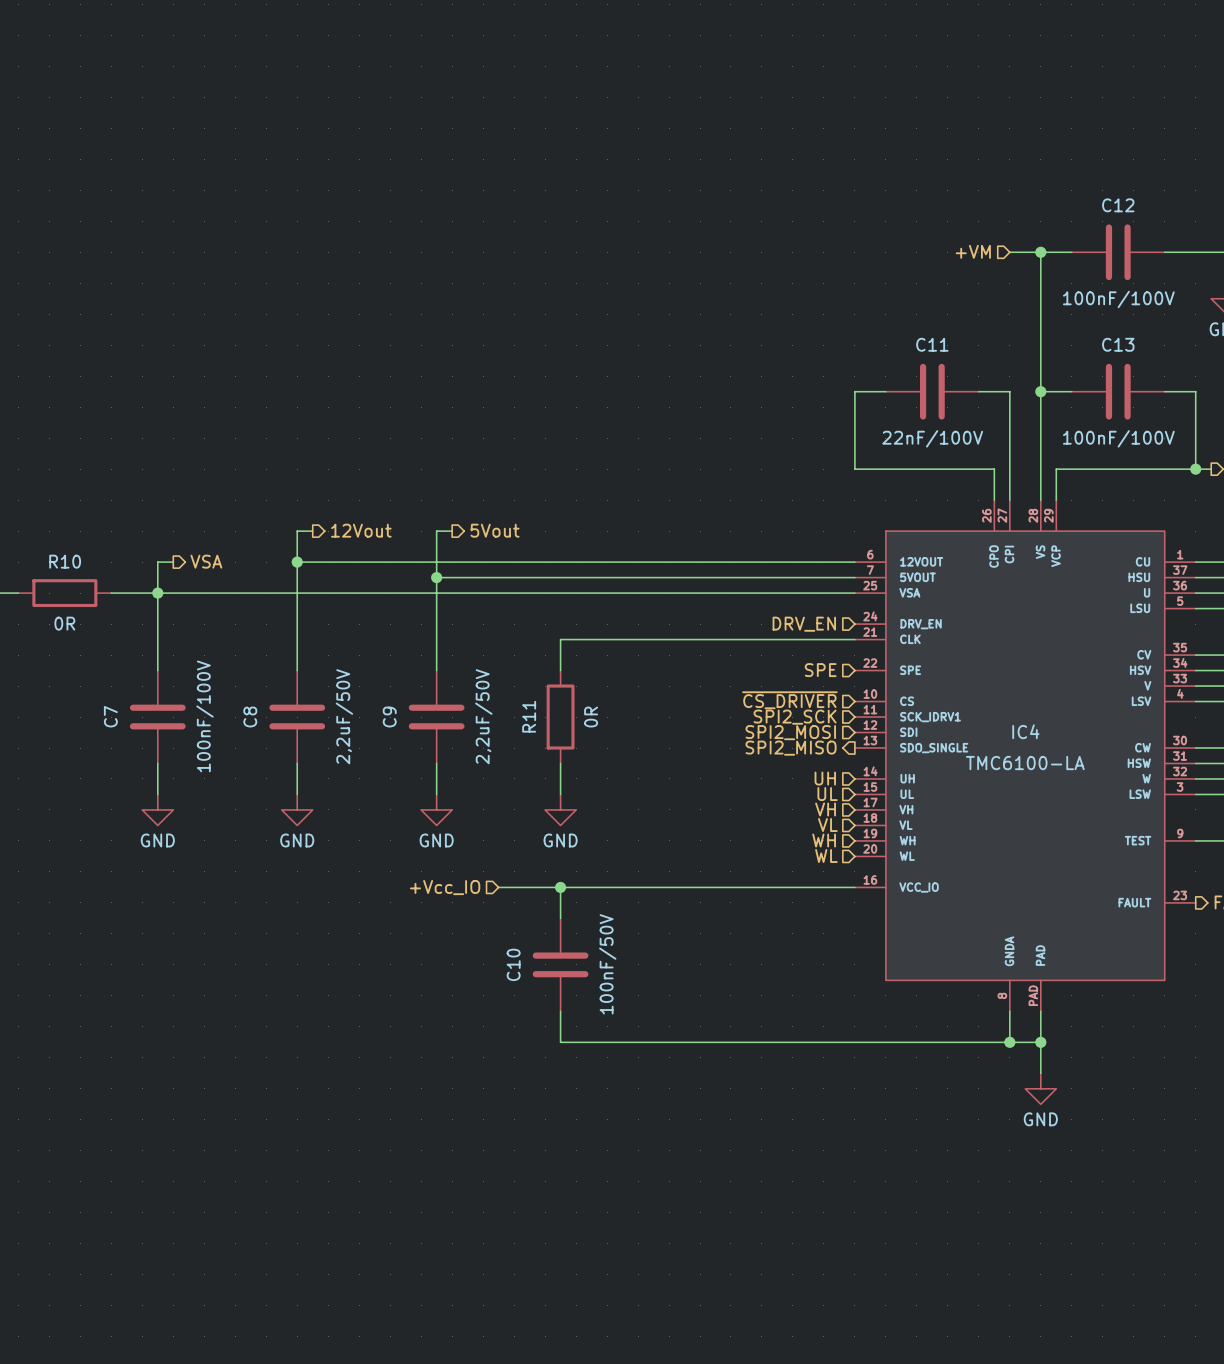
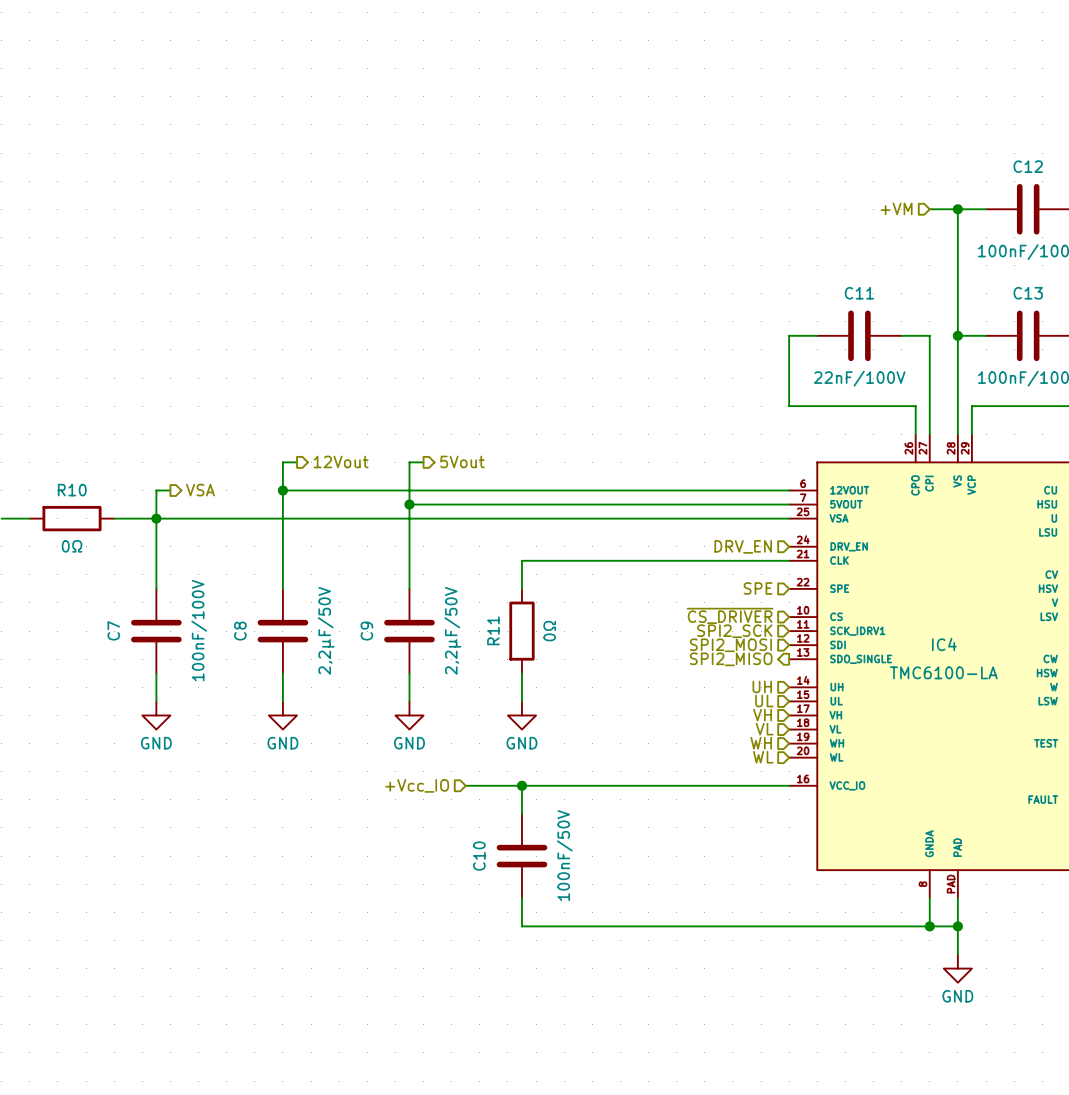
R10 value: 0R (64, 623) -> 0Ω (72, 546)
C8 value: 2,2uF/50V (344, 716) -> 2,2μF/50V (326, 630)
C9 value: 2,2uF/50V (483, 716) -> 2,2μF/50V (452, 630)
R11 value: 0R (591, 717) -> 0Ω (549, 631)

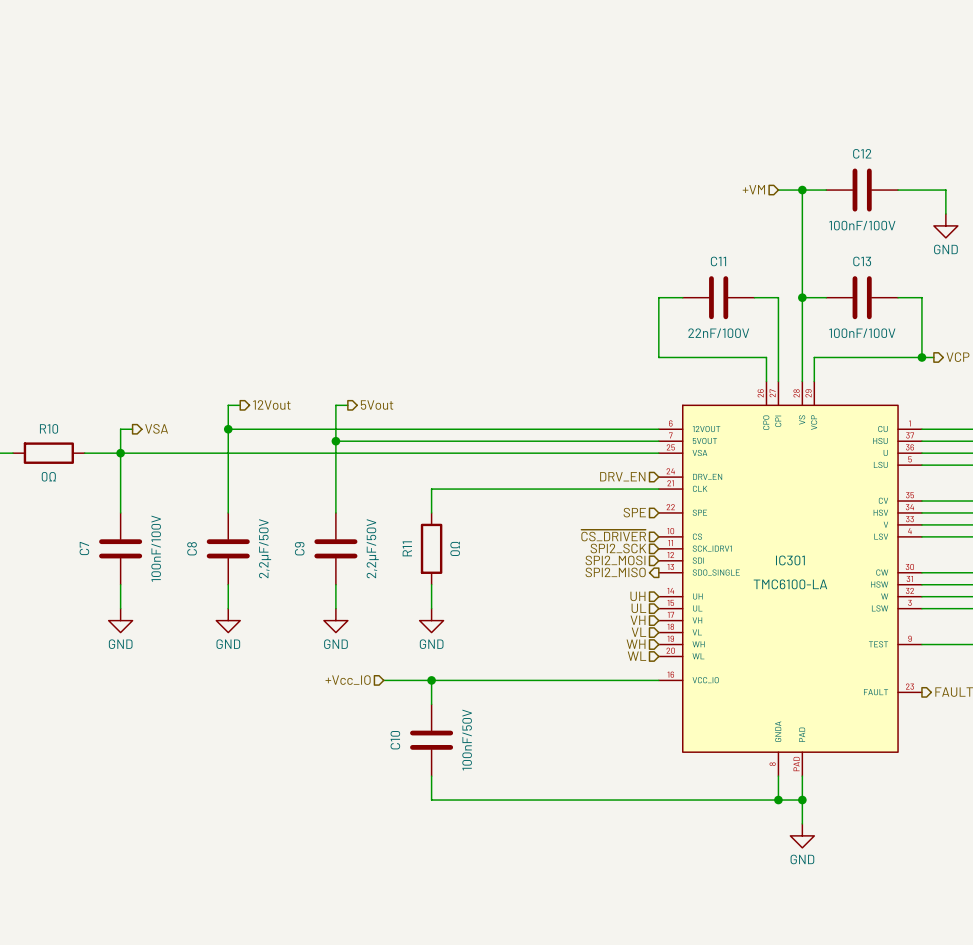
IC4 name: IC4 (944, 644) -> IC301 (790, 560)

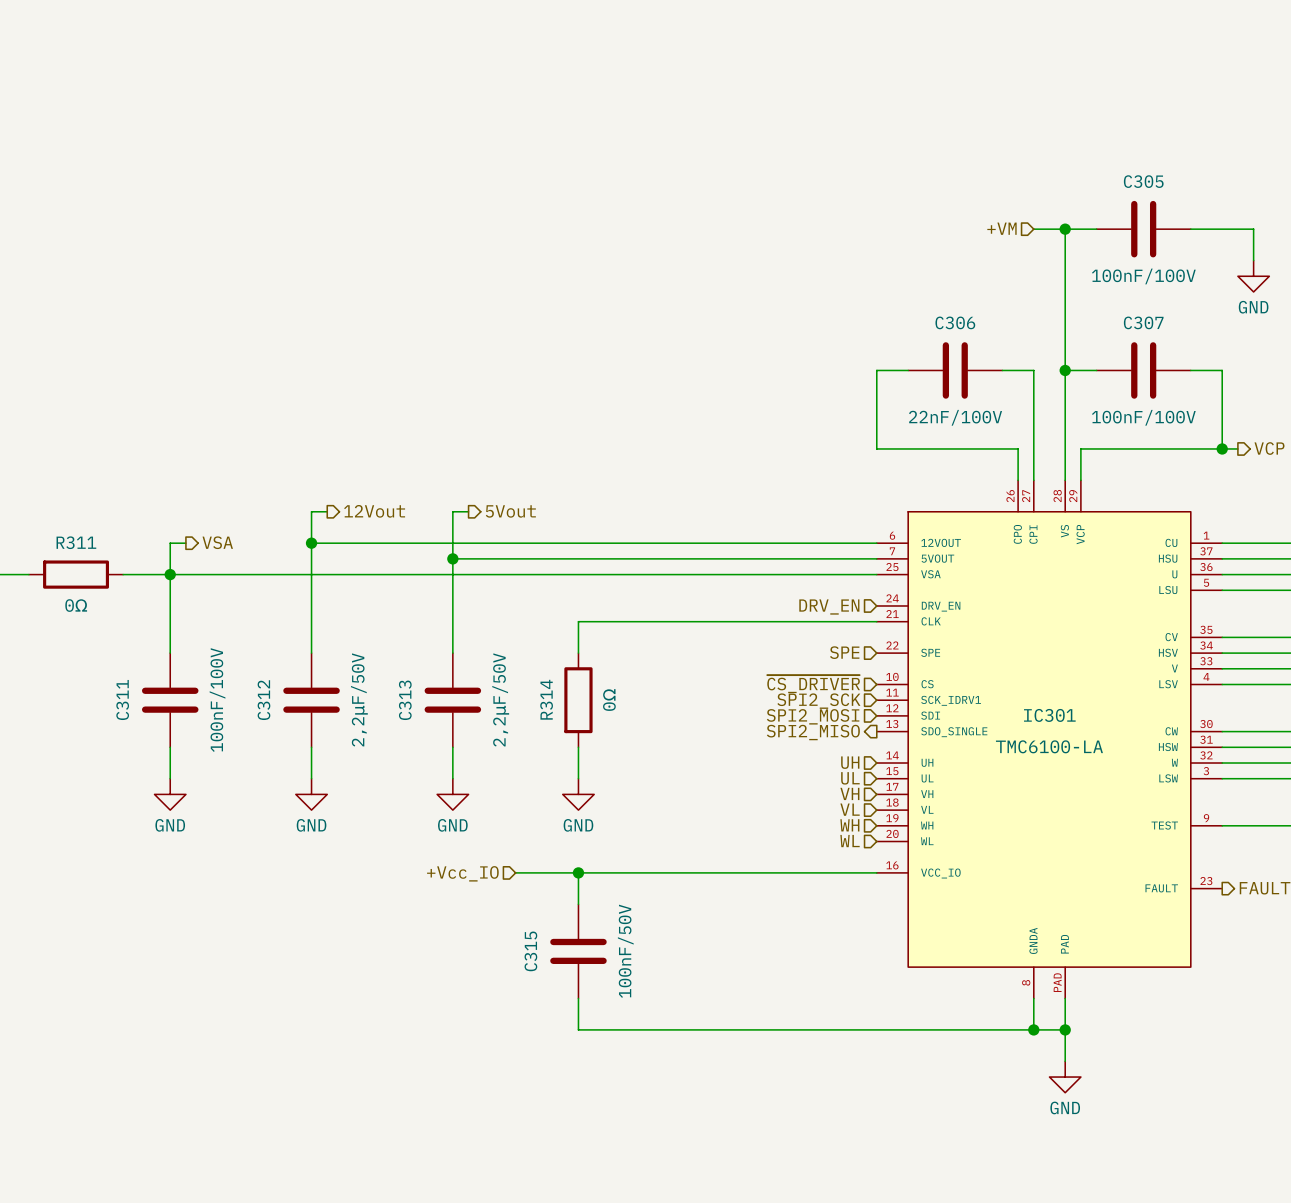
C12 name: C12 (862, 153) -> C305 (1143, 181)
C11 name: C11 (718, 261) -> C306 (955, 322)
C13 name: C13 (862, 261) -> C307 (1143, 322)
R10 name: R10 (49, 428) -> R311 (76, 542)
C7 name: C7 (84, 548) -> C311 (122, 700)
C8 name: C8 (192, 548) -> C312 (263, 700)
C9 name: C9 (299, 548) -> C313 (405, 700)
R11 name: R11 (407, 548) -> R314 (546, 699)
C10 name: C10 (395, 740) -> C315 (530, 951)

